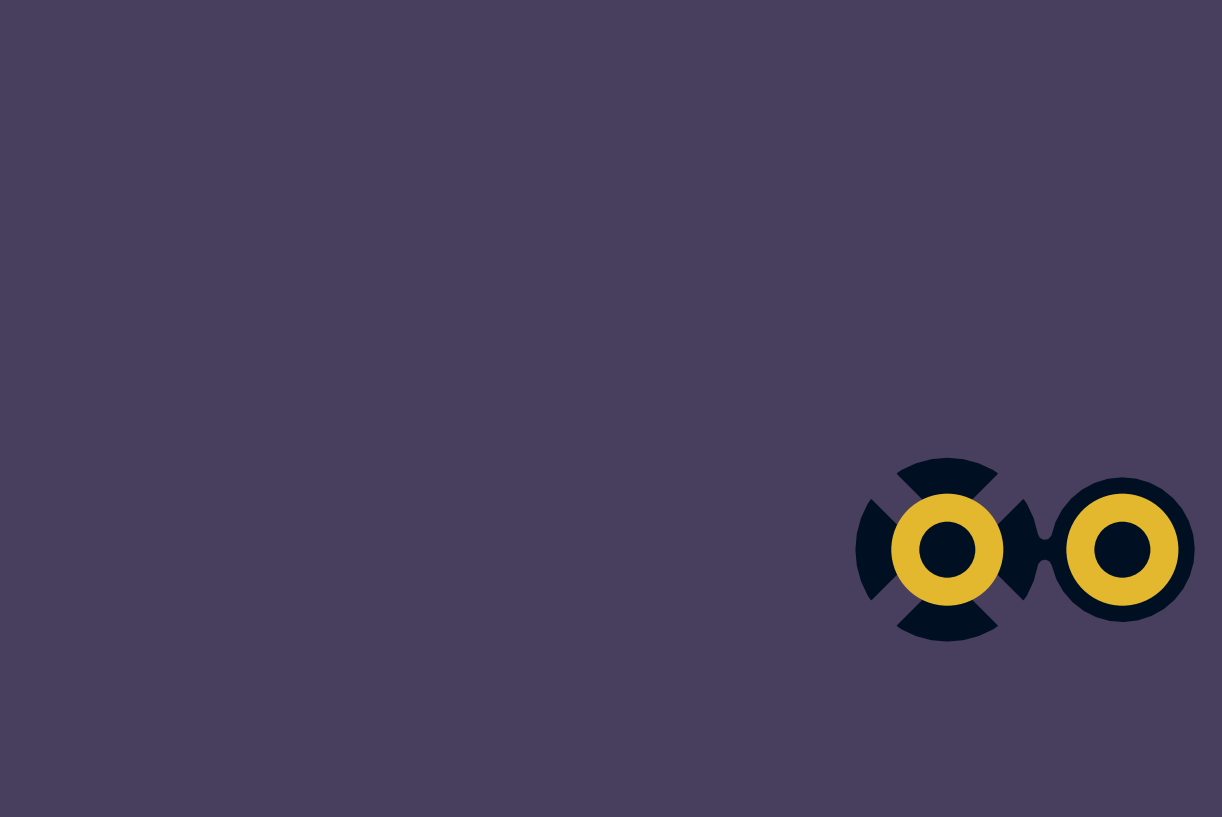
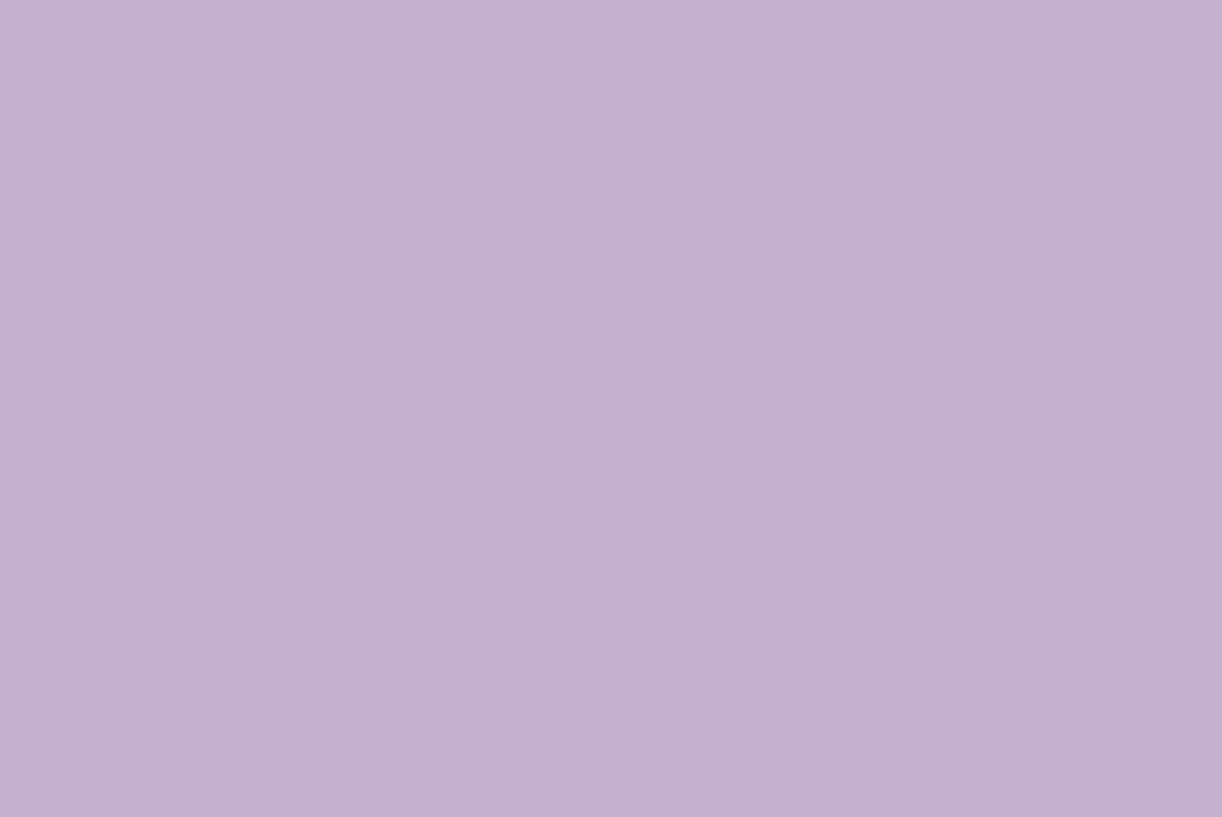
part: (1034, 549) -> none

